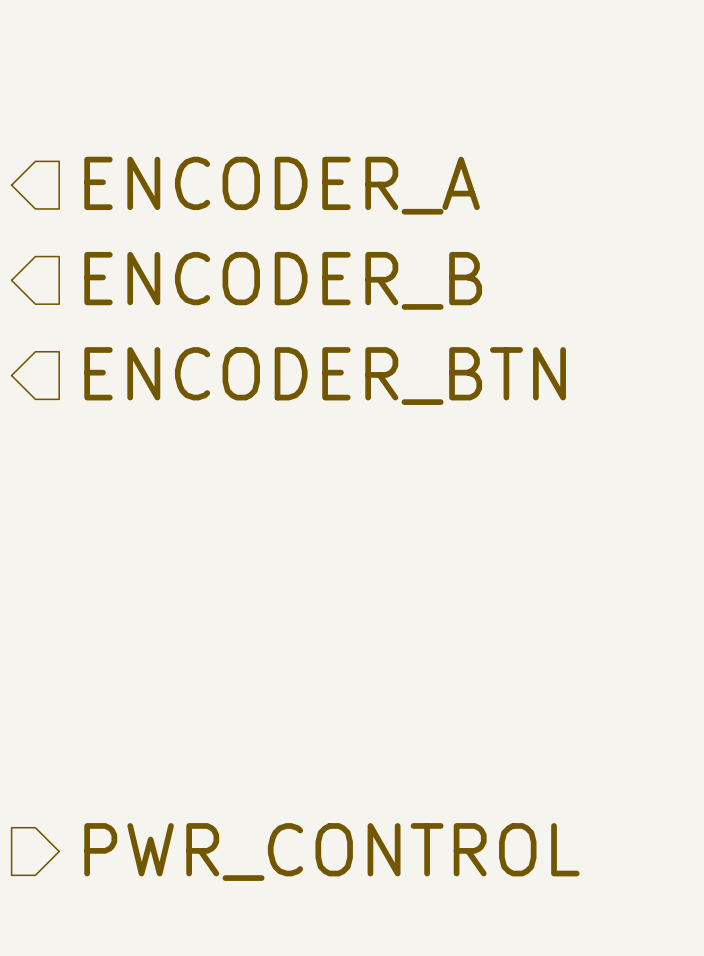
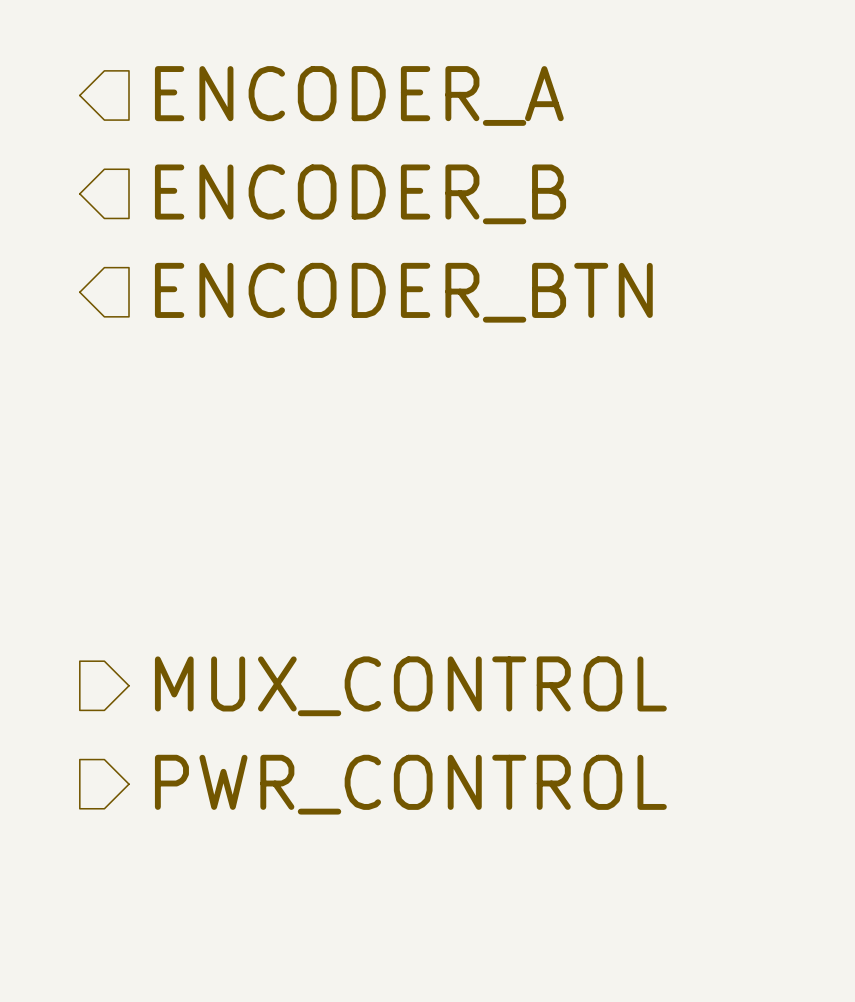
hierarchical label: none -> MUX_CONTROL (410, 686)

